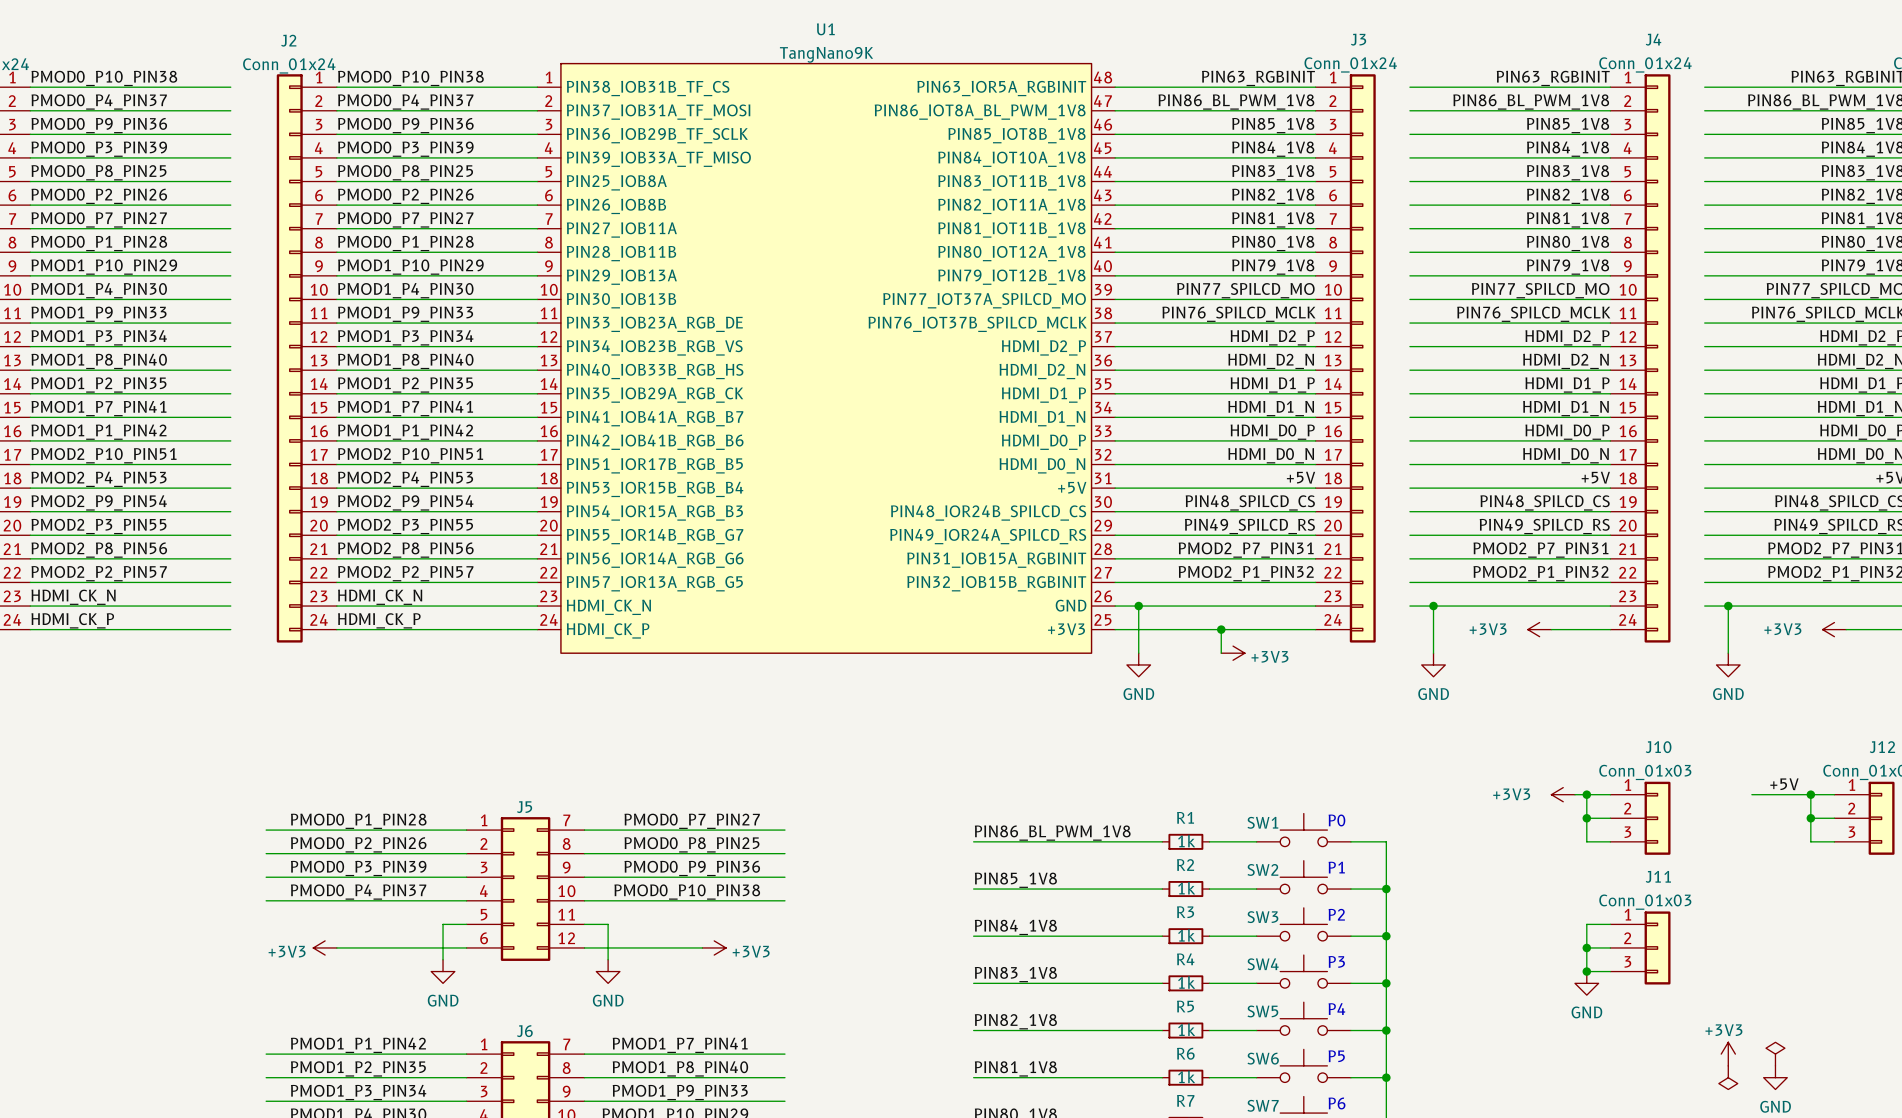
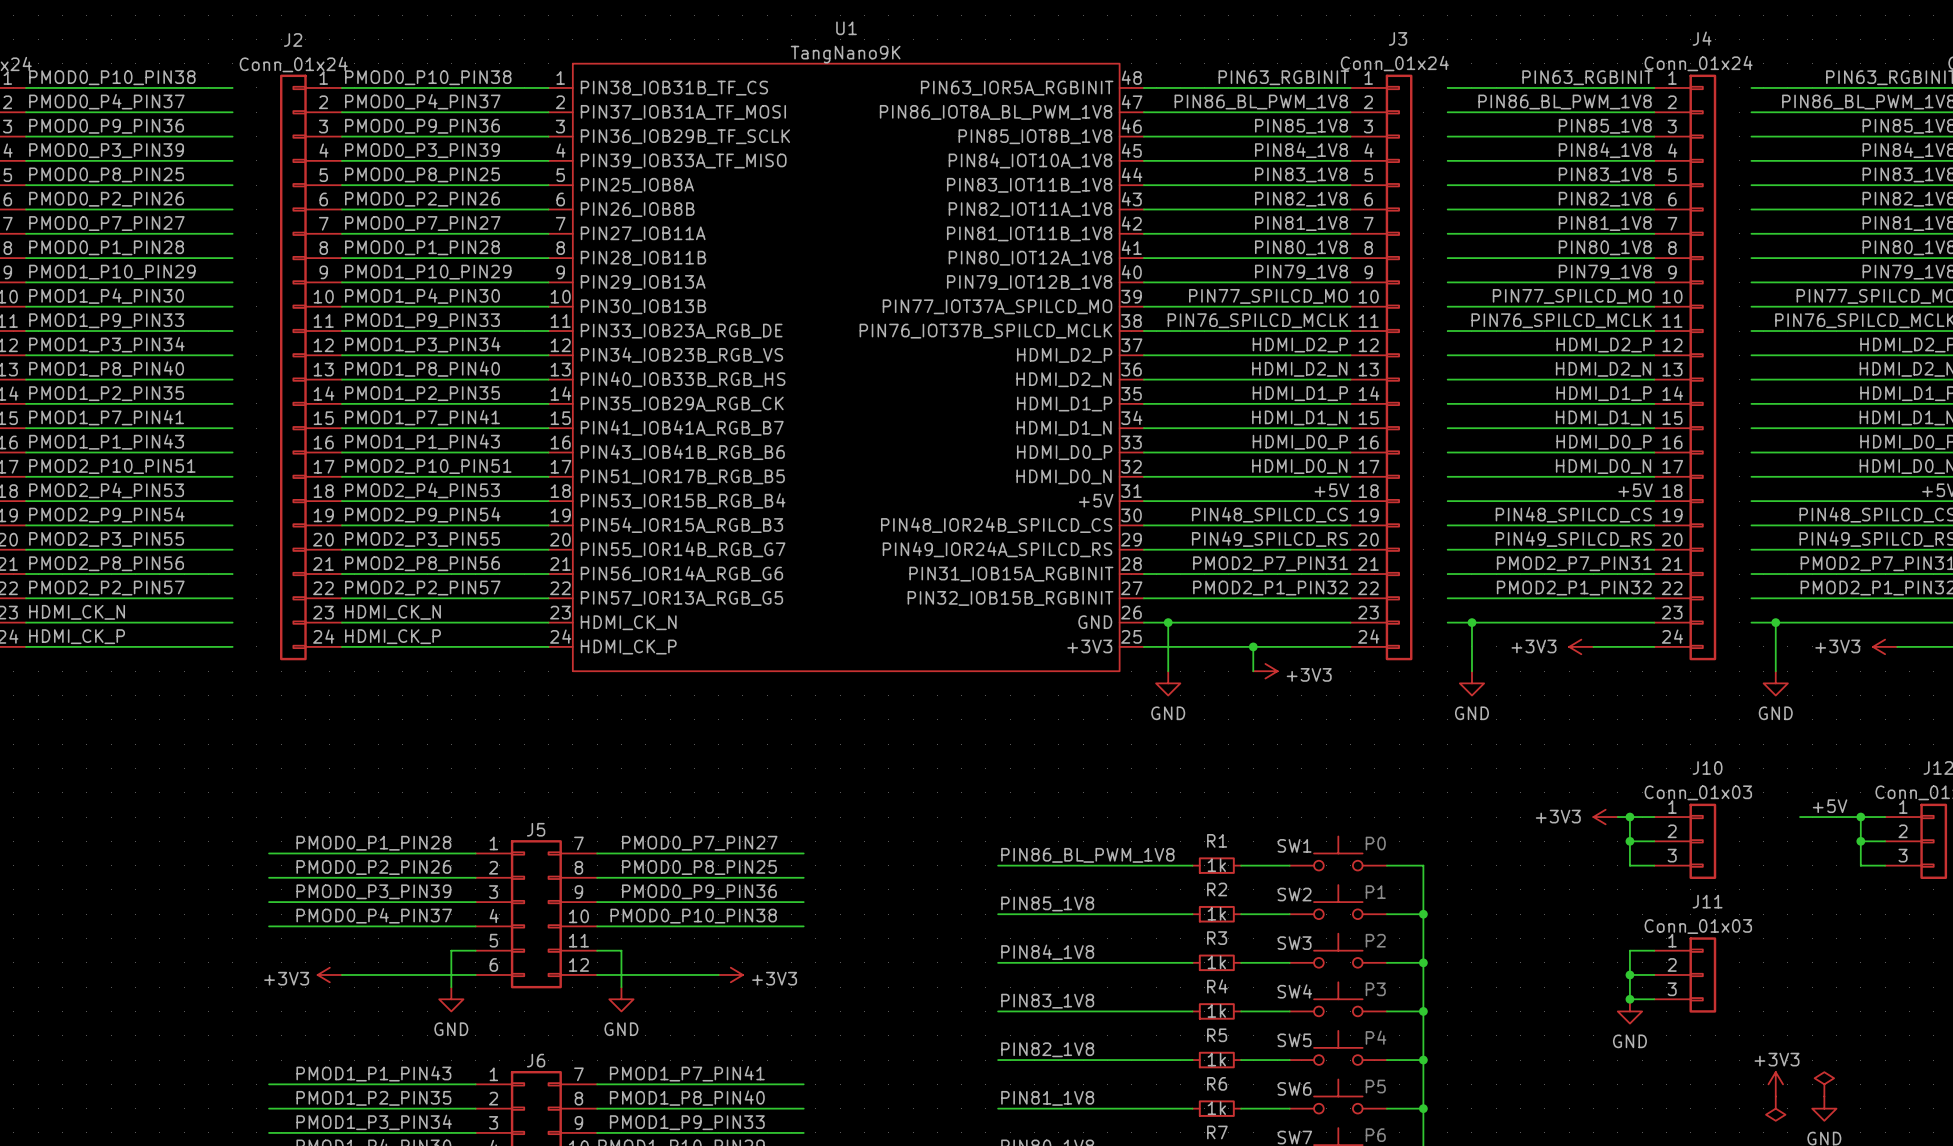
label: PMOD1_P1_PIN42 (99, 432) -> PMOD1_P1_PIN43 (106, 441)
label: PMOD1_P1_PIN42 (405, 432) -> PMOD1_P1_PIN43 (422, 441)
U1 pin name: PIN42_IOB41B_RGB_B6 (655, 442) -> PIN43_IOB41B_RGB_B6 (682, 452)
label: PMOD1_P1_PIN42 (358, 1045) -> PMOD1_P1_PIN43 (373, 1073)

